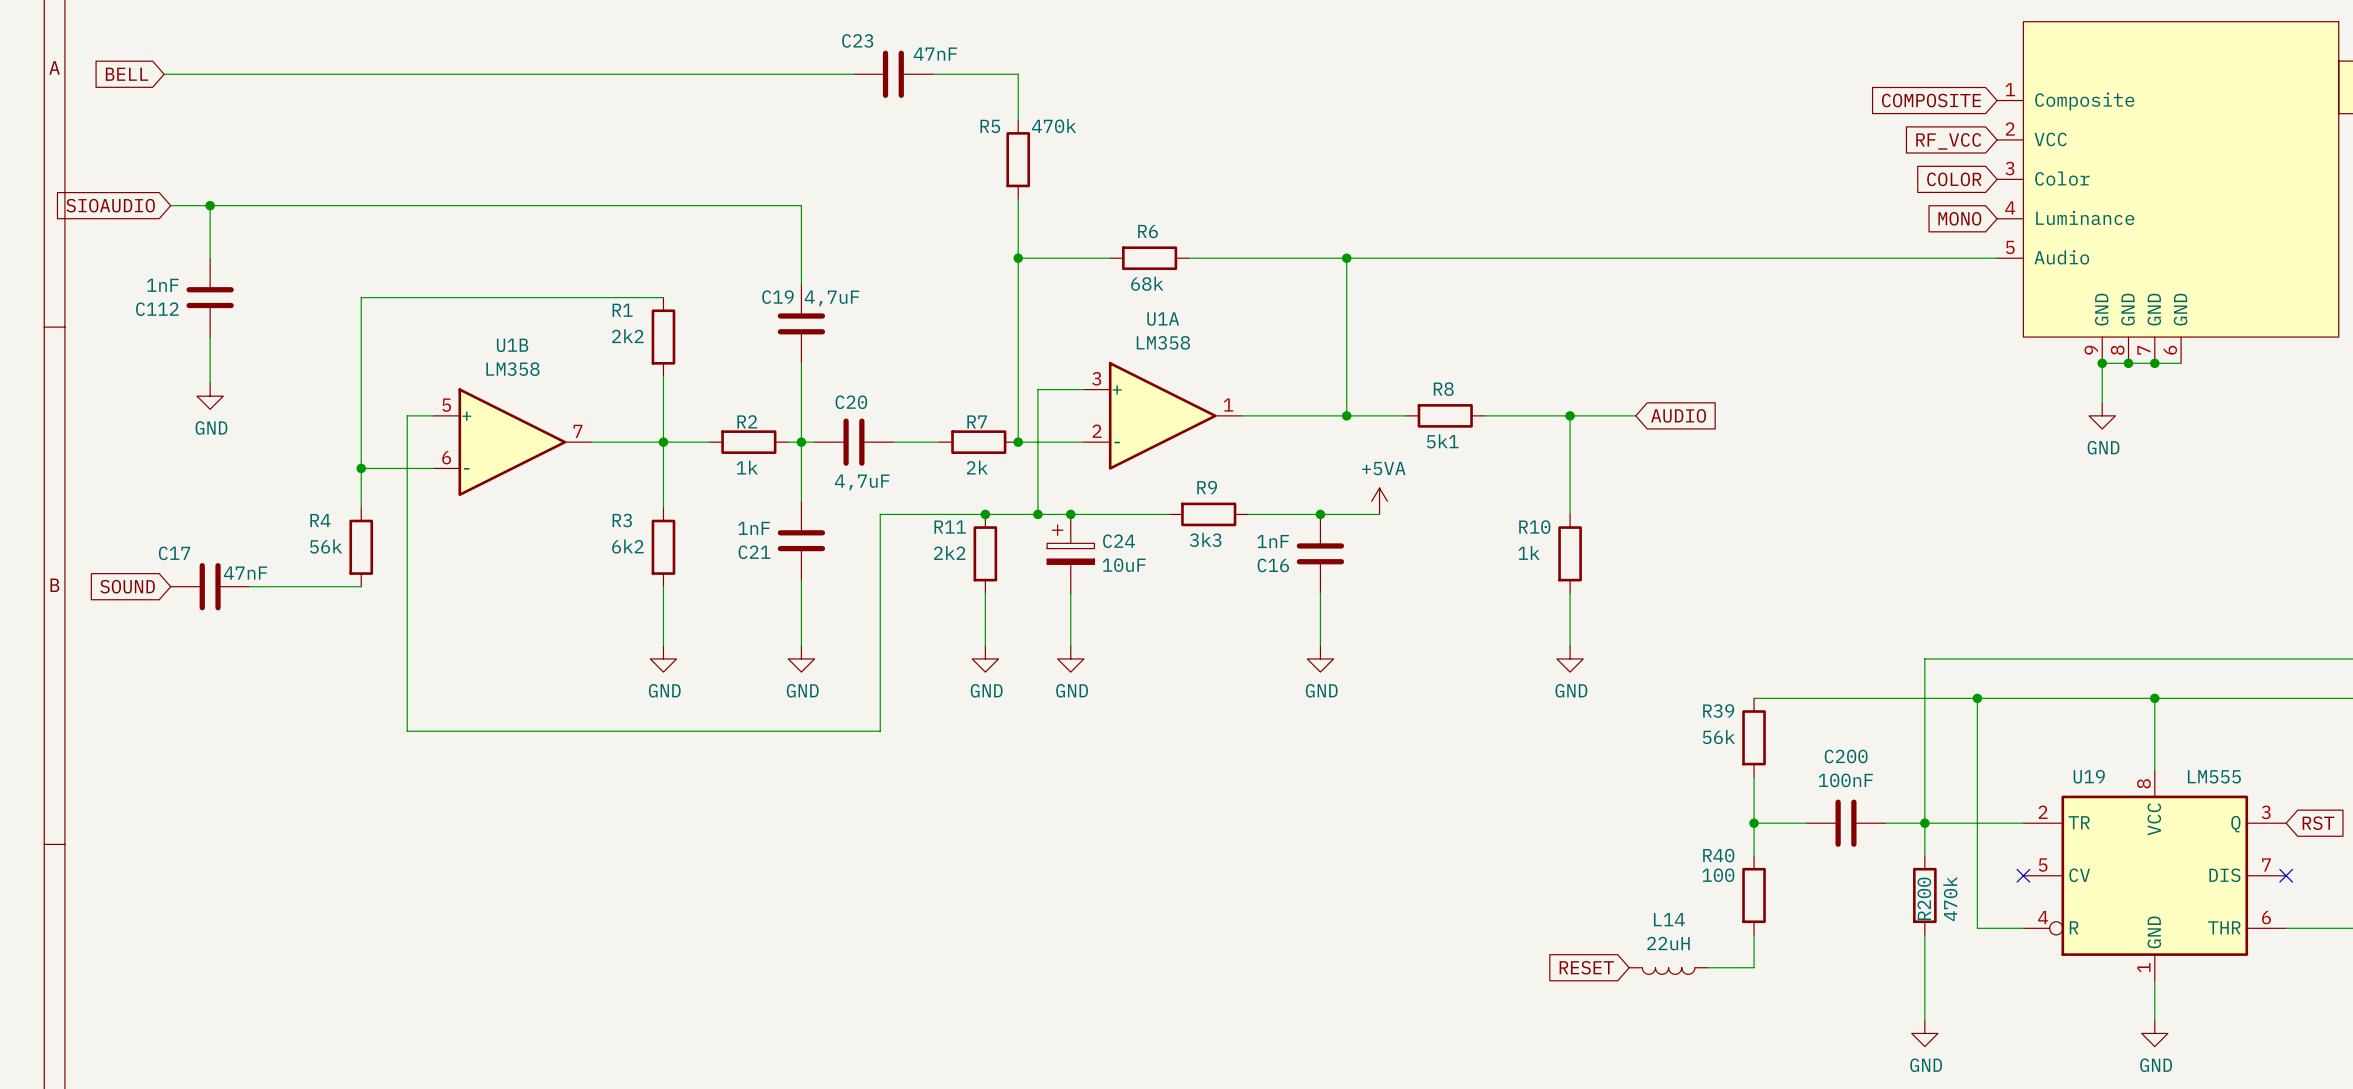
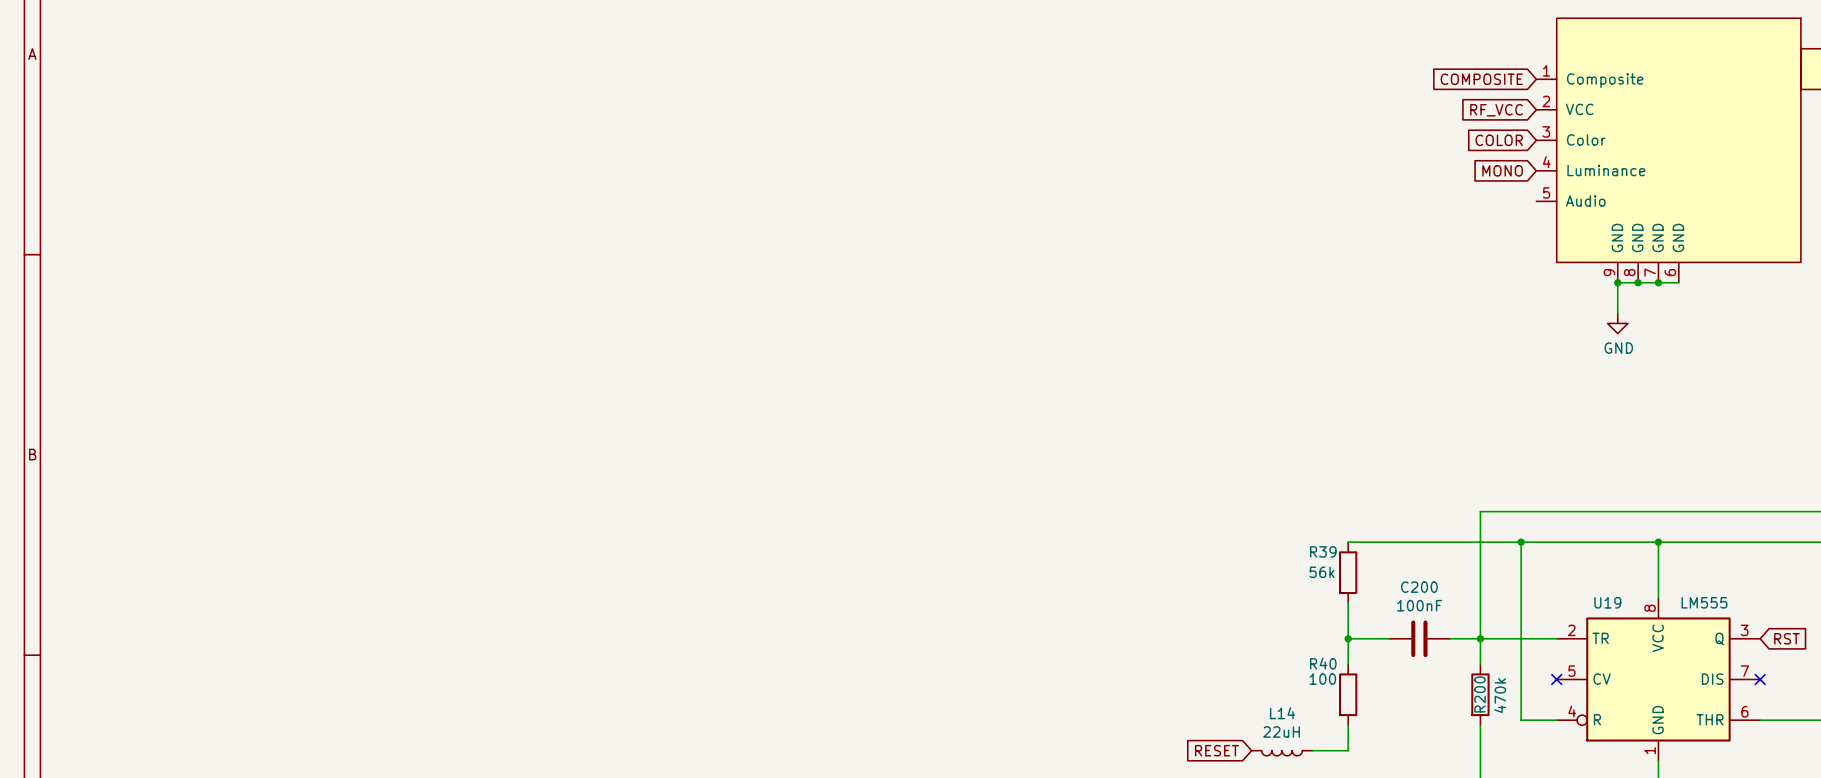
global label: BELL (126, 74) -> none
wire: (164, 74) (853, 74) -> none
C23: 47nF (893, 74) -> none
wire: (932, 74) (1018, 74) (1018, 120) -> none
R5: 470k (1018, 159) -> none
wire: (1018, 199) (1018, 442) (1083, 442) -> none
global label: SIOAUDIO (110, 205) -> none
wire: (170, 205) (801, 205) (801, 284) -> none
wire: (210, 205) (210, 258) -> none
junction: (210, 205) -> none
wire: (1018, 258) (1110, 258) -> none
junction: (1018, 258) -> none
R6: 68k (1149, 258) -> none
wire: (1189, 258) (1997, 258) -> none
wire: (1346, 258) (1346, 415) -> none
junction: (1346, 258) -> none
C112: 1nF (210, 297) -> none
wire: (663, 297) (361, 297) (361, 507) -> none
C19: 4,7uF (801, 323) -> none
wire: (210, 337) (210, 383) -> none
R1: 2k2 (663, 337) -> none
wire: (801, 363) (801, 501) -> none
wire: (663, 376) (663, 507) -> none
wire: (1083, 389) (1037, 389) (1037, 514) -> none
power symbol: GND (210, 396) -> none
wire: (433, 415) (407, 415) (407, 731) (880, 731) (880, 514) (1169, 514) -> none
U1A: LM358 (1162, 415) -> none
wire: (1241, 415) (1405, 415) -> none
junction: (1346, 415) -> none
R8: 5k1 (1445, 415) -> none
wire: (1484, 415) (1635, 415) -> none
wire: (1570, 415) (1570, 514) -> none
junction: (1570, 415) -> none
global label: AUDIO (1678, 415) -> none
U1B: LM358 (512, 442) -> none
wire: (591, 442) (709, 442) -> none
junction: (663, 442) -> none
R2: 1k (748, 442) -> none
wire: (788, 442) (814, 442) -> none
junction: (801, 442) -> none
C20: 4,7uF (853, 442) -> none
wire: (893, 442) (939, 442) -> none
R7: 2k (978, 442) -> none
junction: (1018, 442) -> none
wire: (361, 468) (433, 468) -> none
junction: (361, 468) -> none
power symbol: +5VA (1379, 501) -> none
junction: (985, 514) -> none
junction: (1037, 514) -> none
junction: (1070, 514) -> none
R9: 3k3 (1208, 514) -> none
wire: (1248, 514) (1379, 514) -> none
junction: (1320, 514) -> none
C21: 1nF (801, 540) -> none
R4: 56k (361, 547) -> none
R3: 6k2 (663, 547) -> none
R11: 2k2 (985, 553) -> none
C24: 10uF (1070, 553) -> none
C16: 1nF (1320, 553) -> none
R10: 1k (1570, 553) -> none
wire: (801, 580) (801, 645) -> none
global label: SOUND (127, 586) -> none
C17: 47nF (210, 586) -> none
wire: (249, 586) (361, 586) -> none
wire: (663, 586) (663, 645) -> none
wire: (985, 593) (985, 645) -> none
wire: (1070, 593) (1070, 645) -> none
wire: (1320, 593) (1320, 645) -> none
wire: (1570, 593) (1570, 645) -> none
power symbol: GND (663, 658) -> none
power symbol: GND (801, 658) -> none
power symbol: GND (985, 658) -> none
power symbol: GND (1070, 658) -> none
power symbol: GND (1320, 658) -> none
power symbol: GND (1570, 658) -> none

